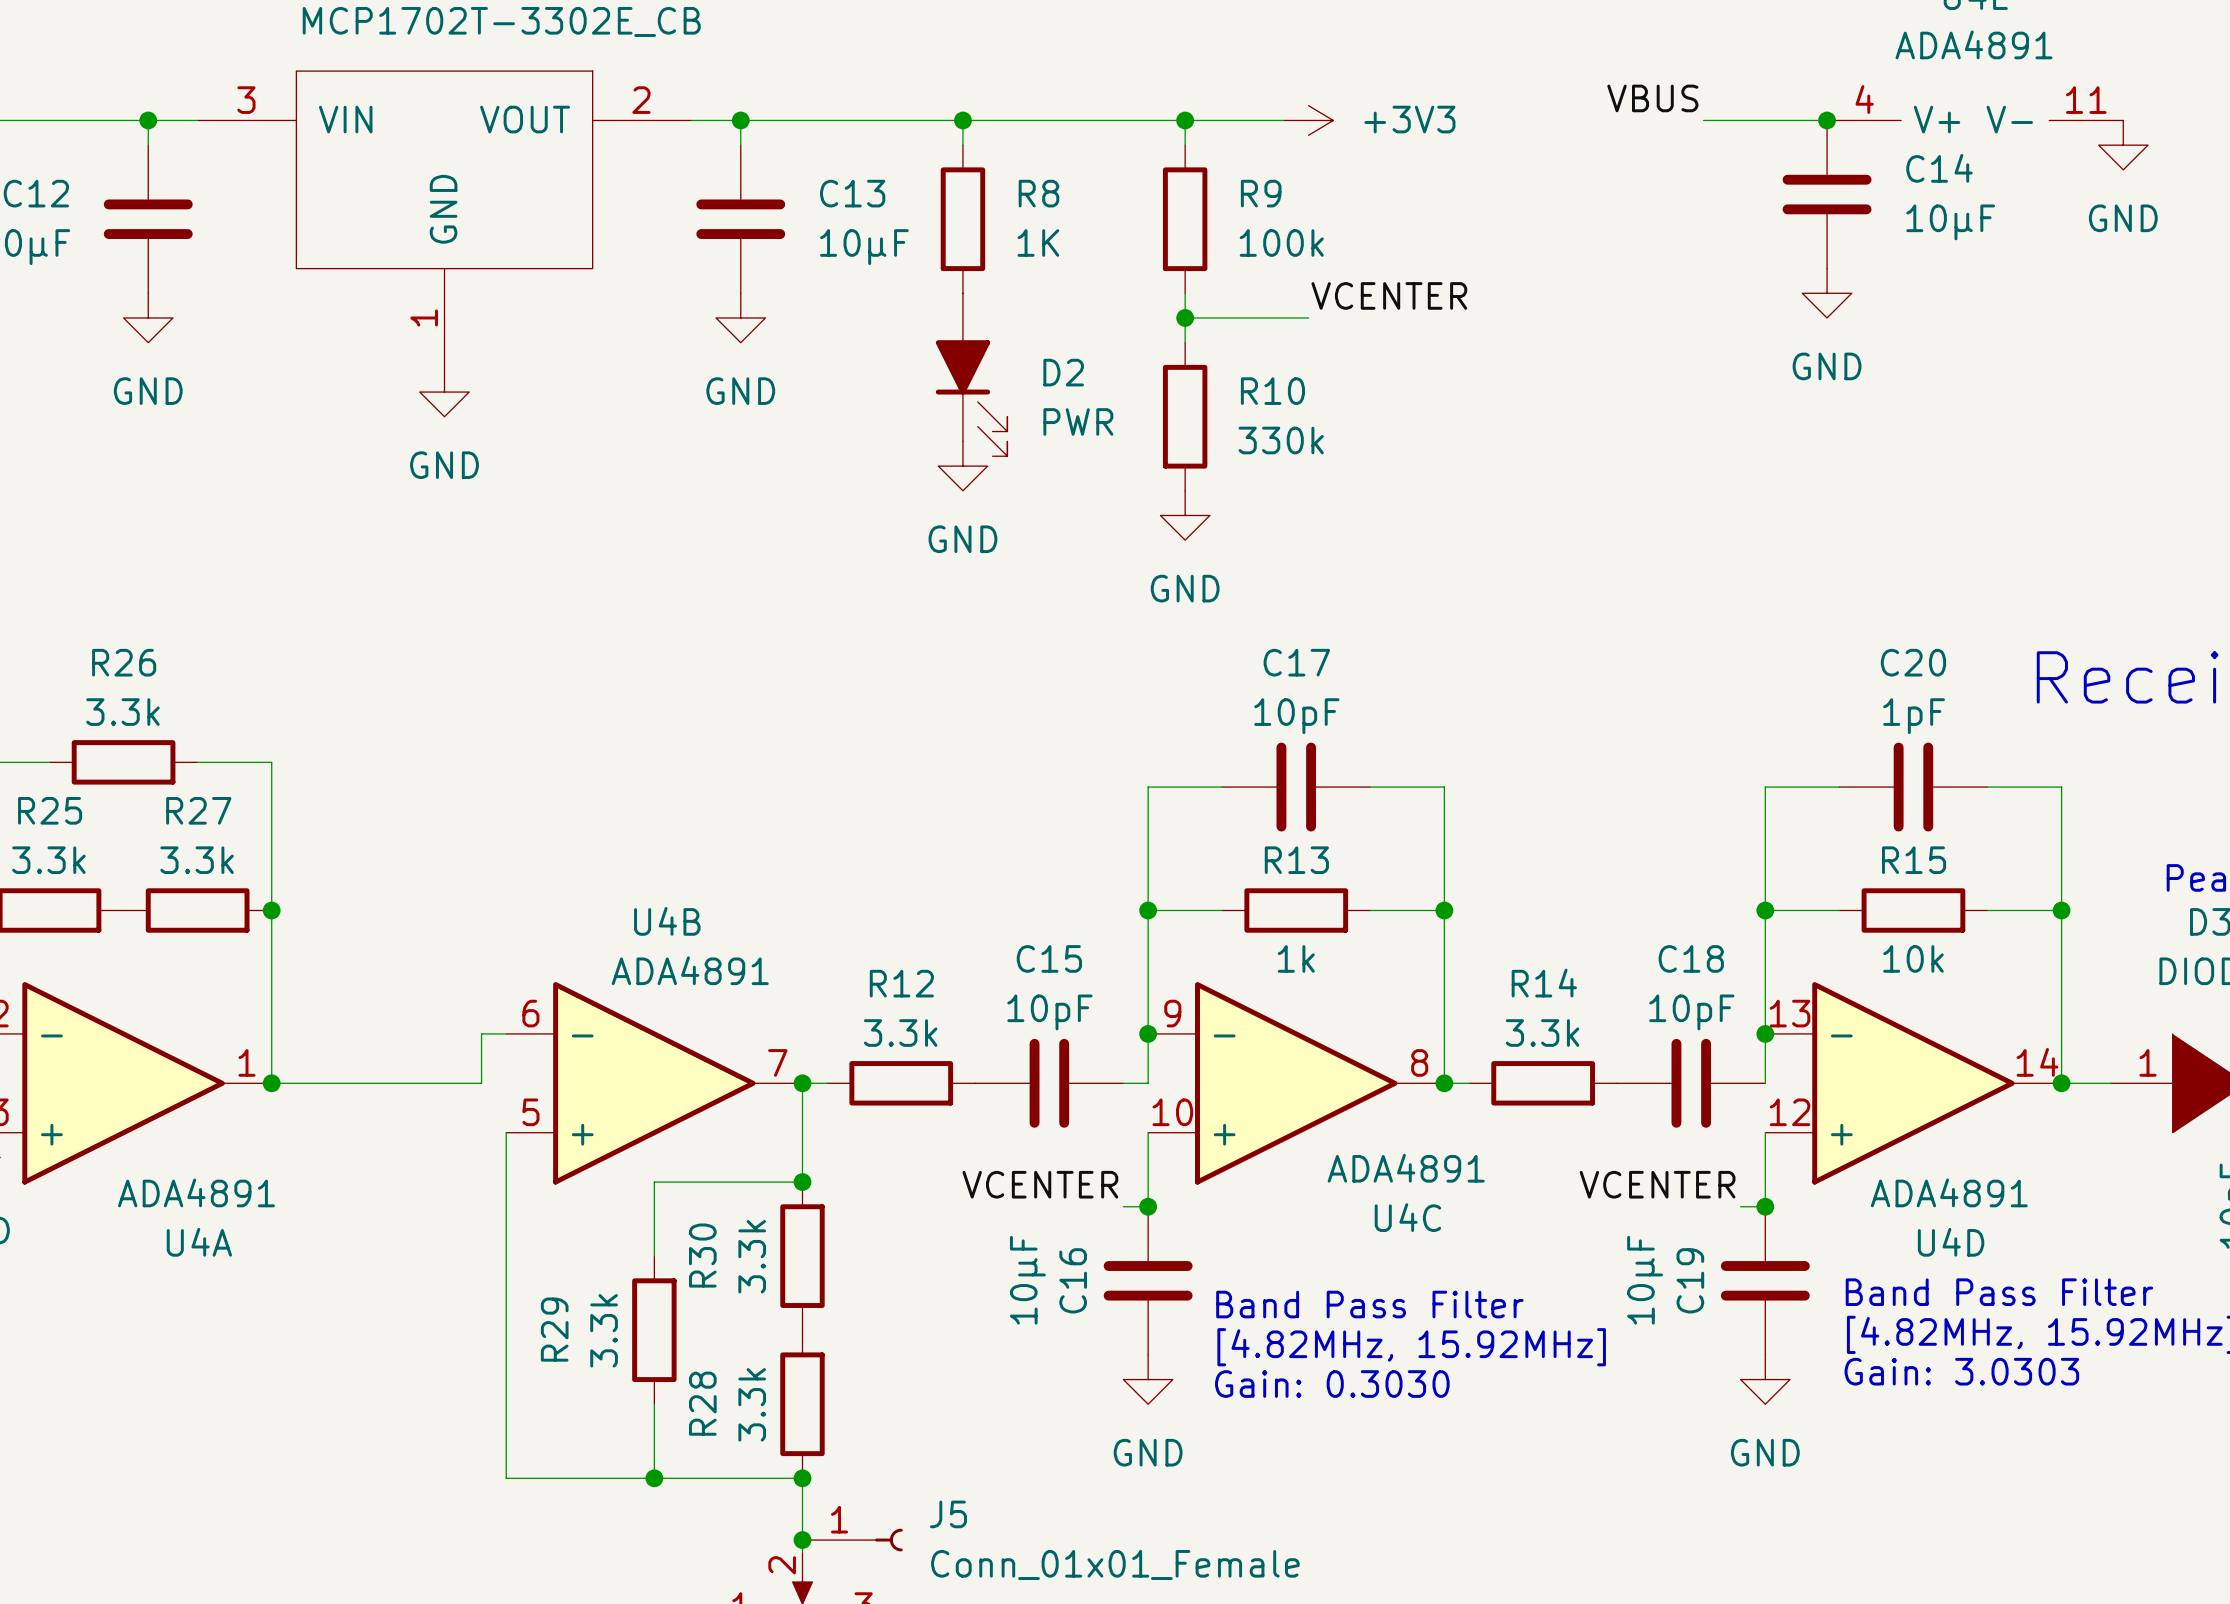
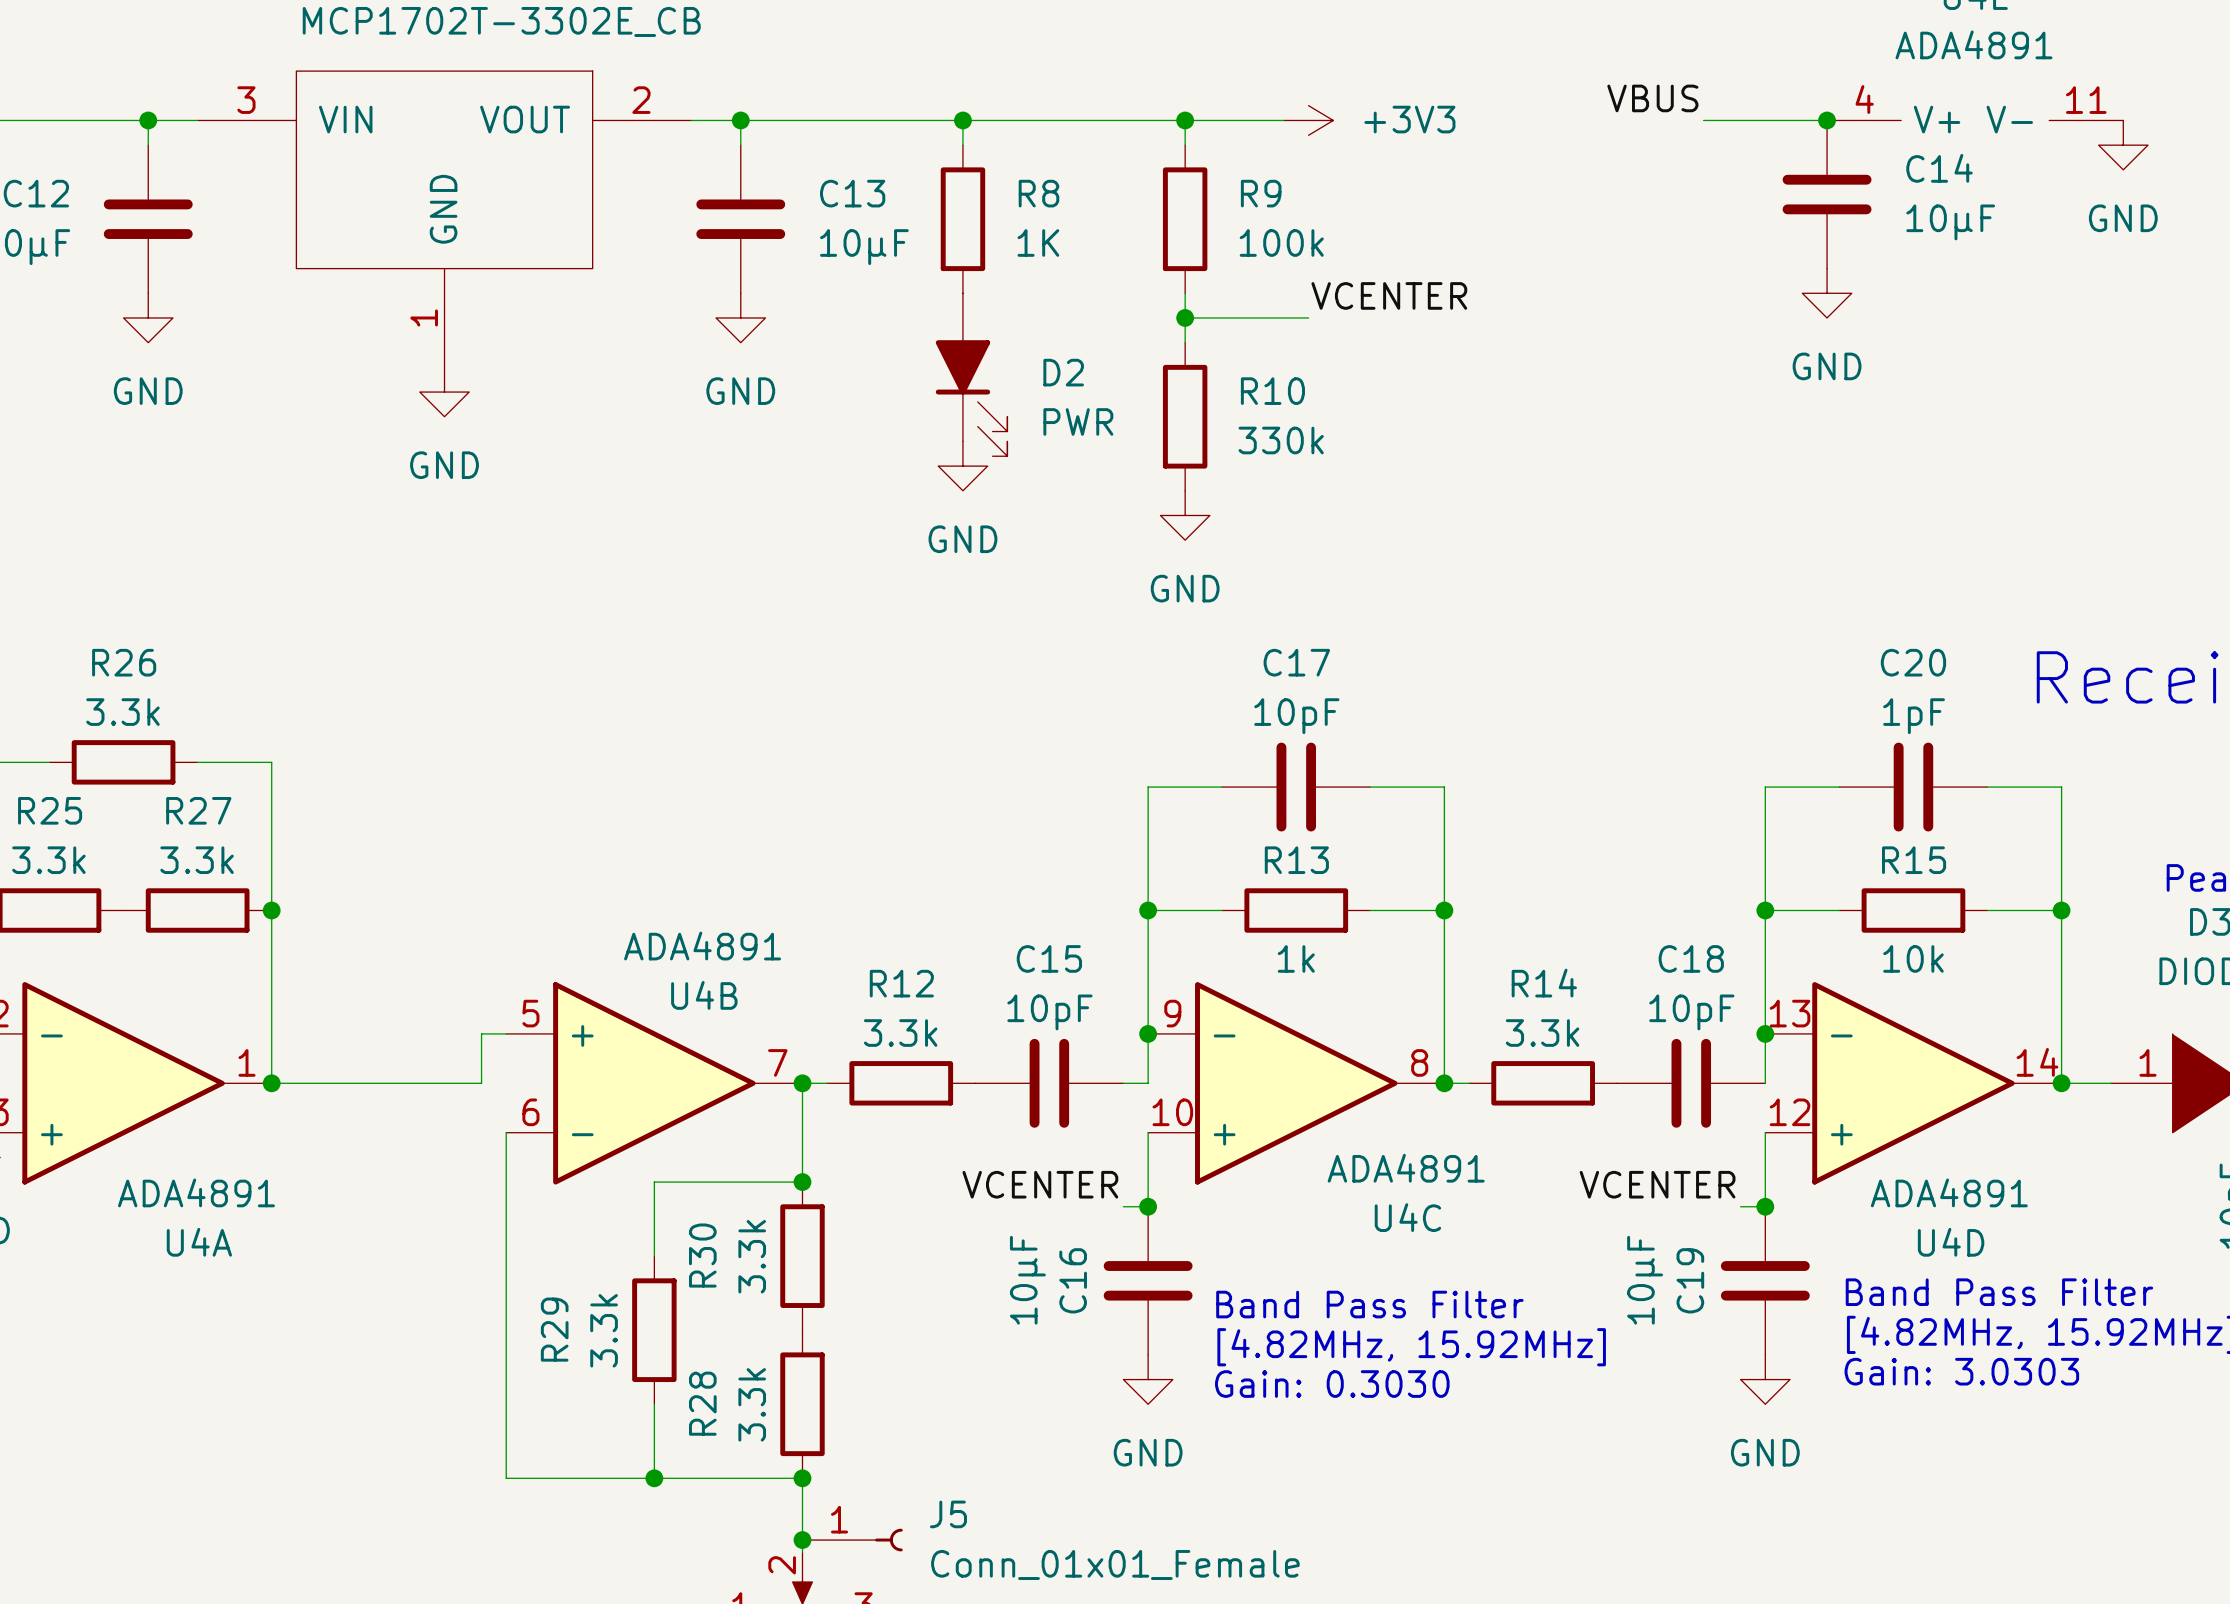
U4B name position: U4B (667, 921) -> U4B (704, 995)
U4B flip: as is (654, 1083) -> up-down (654, 1083)

